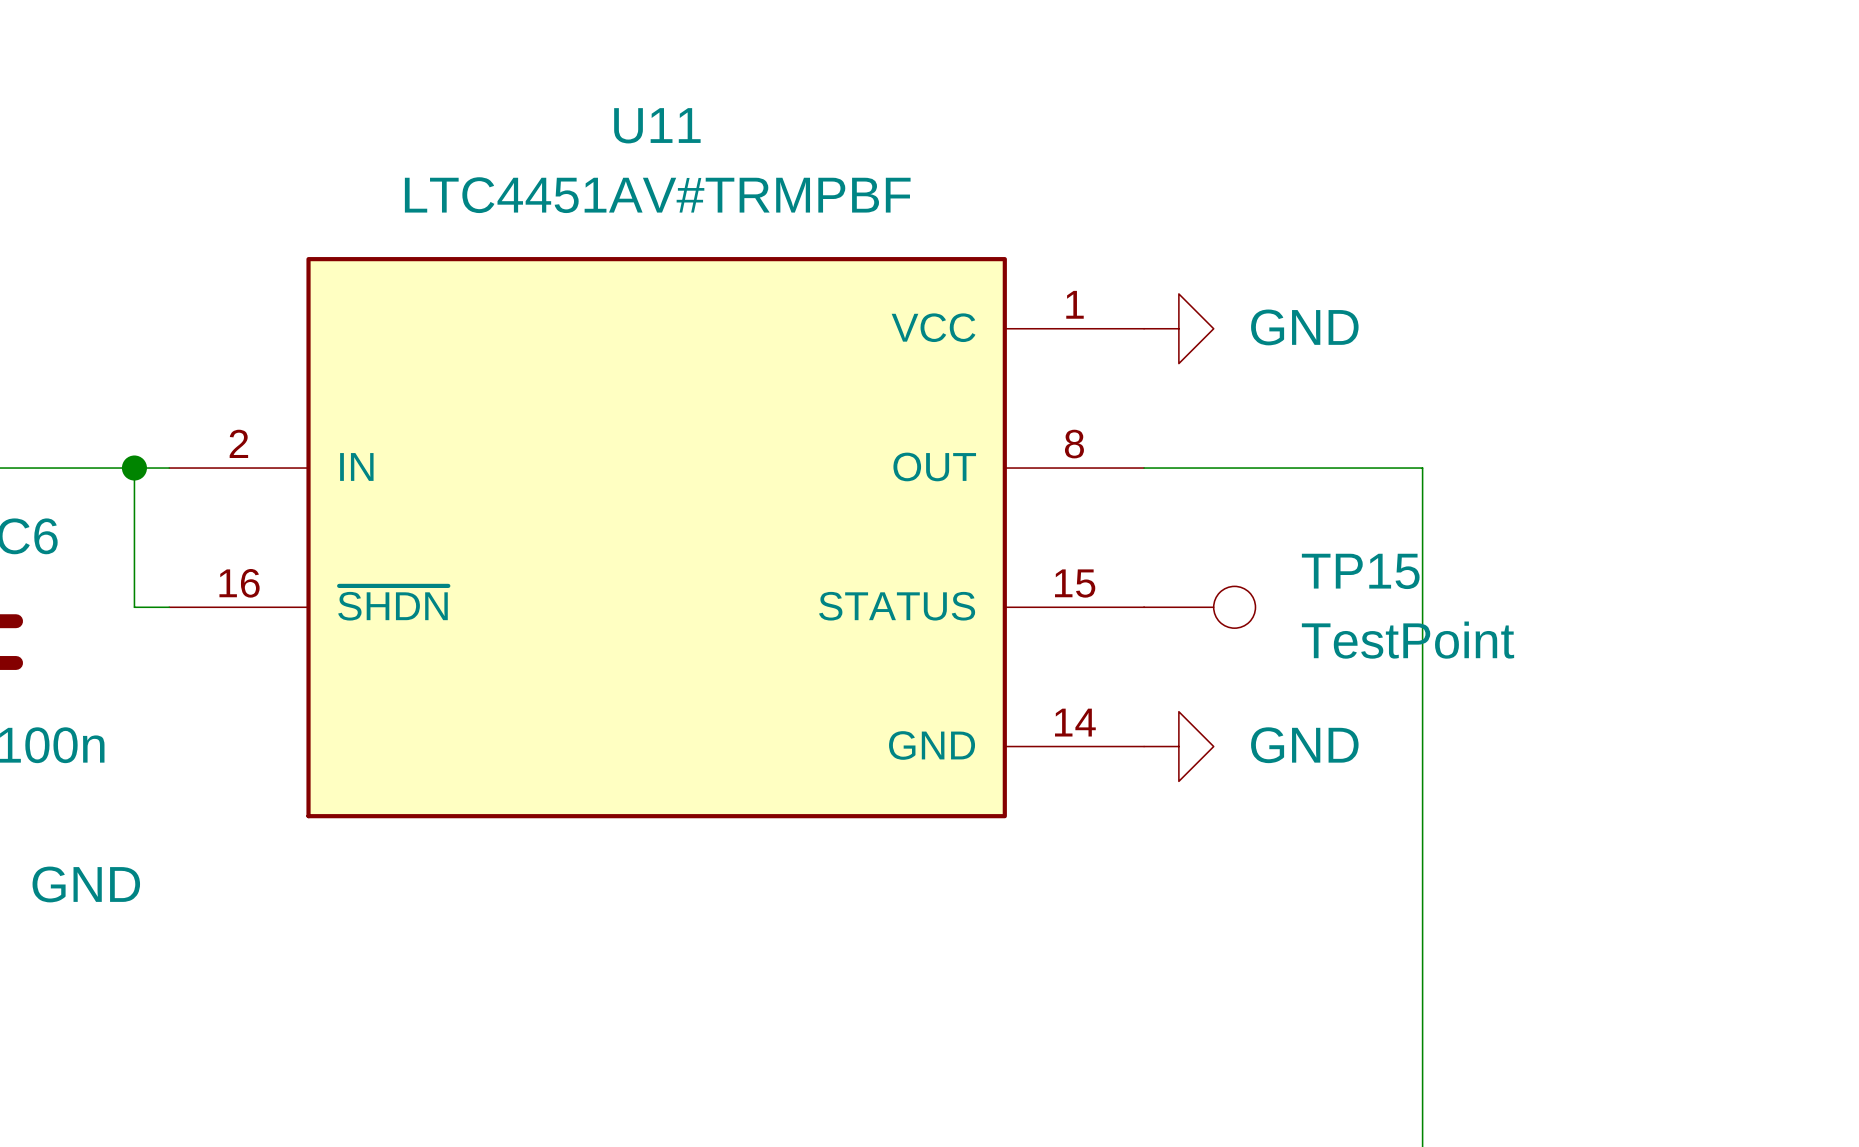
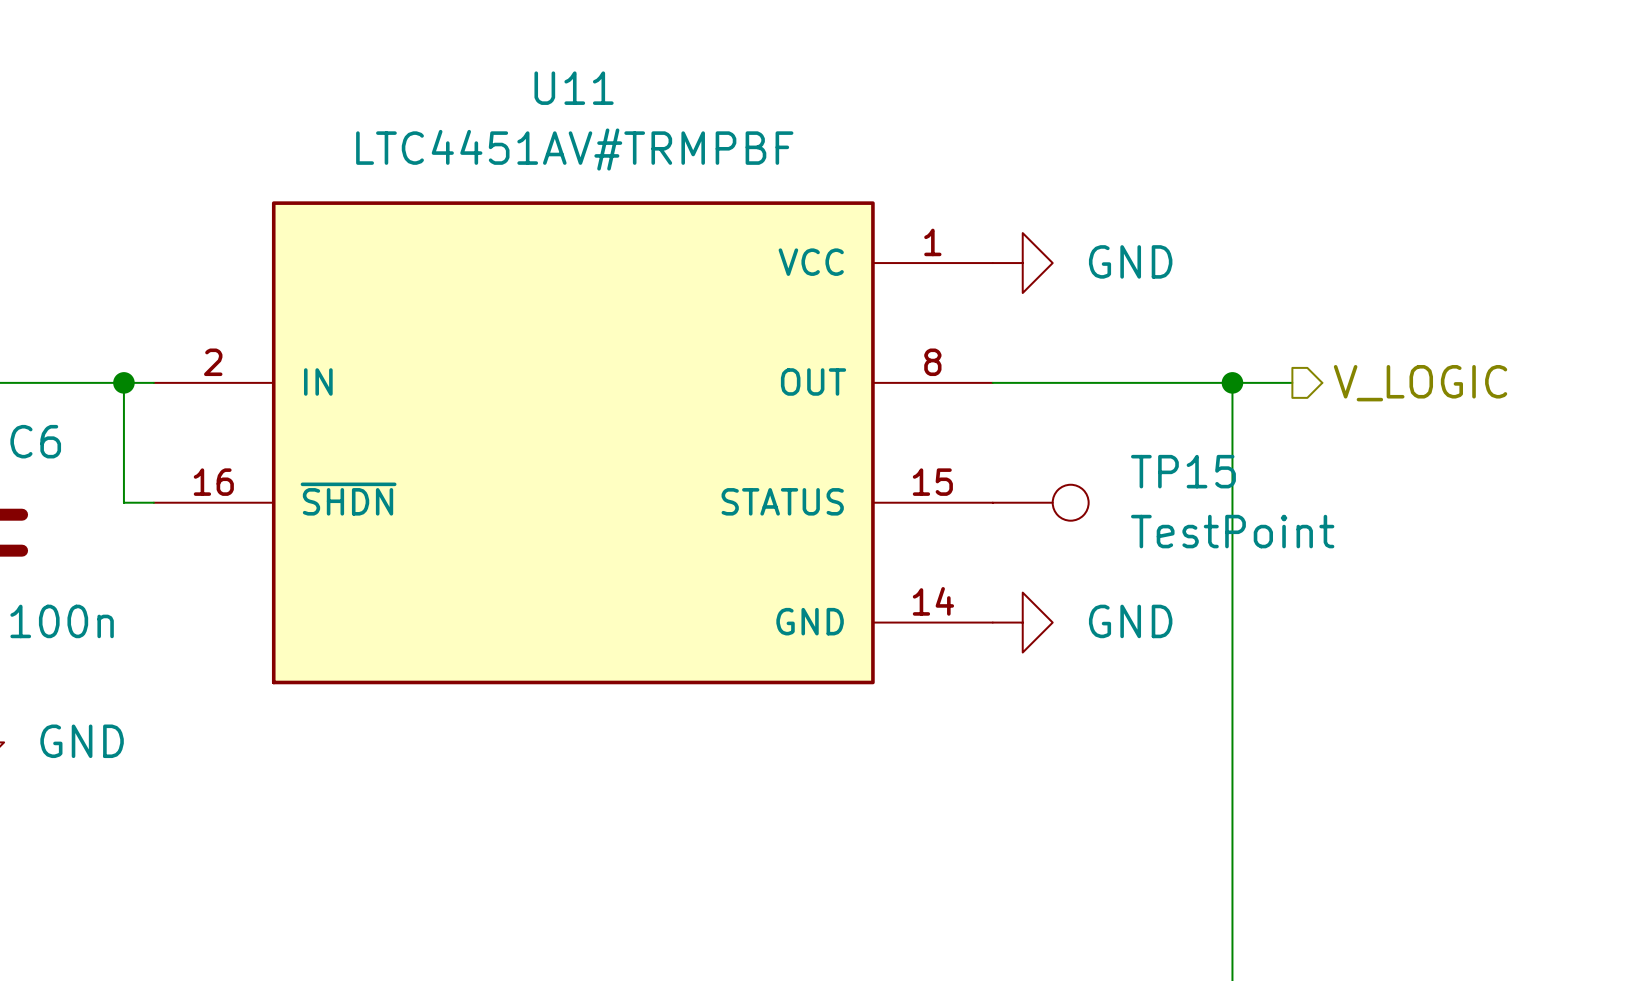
wire: none -> (1232, 382) (1292, 382)
junction: none -> (1232, 382)
hierarchical label: none -> V_LOGIC (1420, 383)

